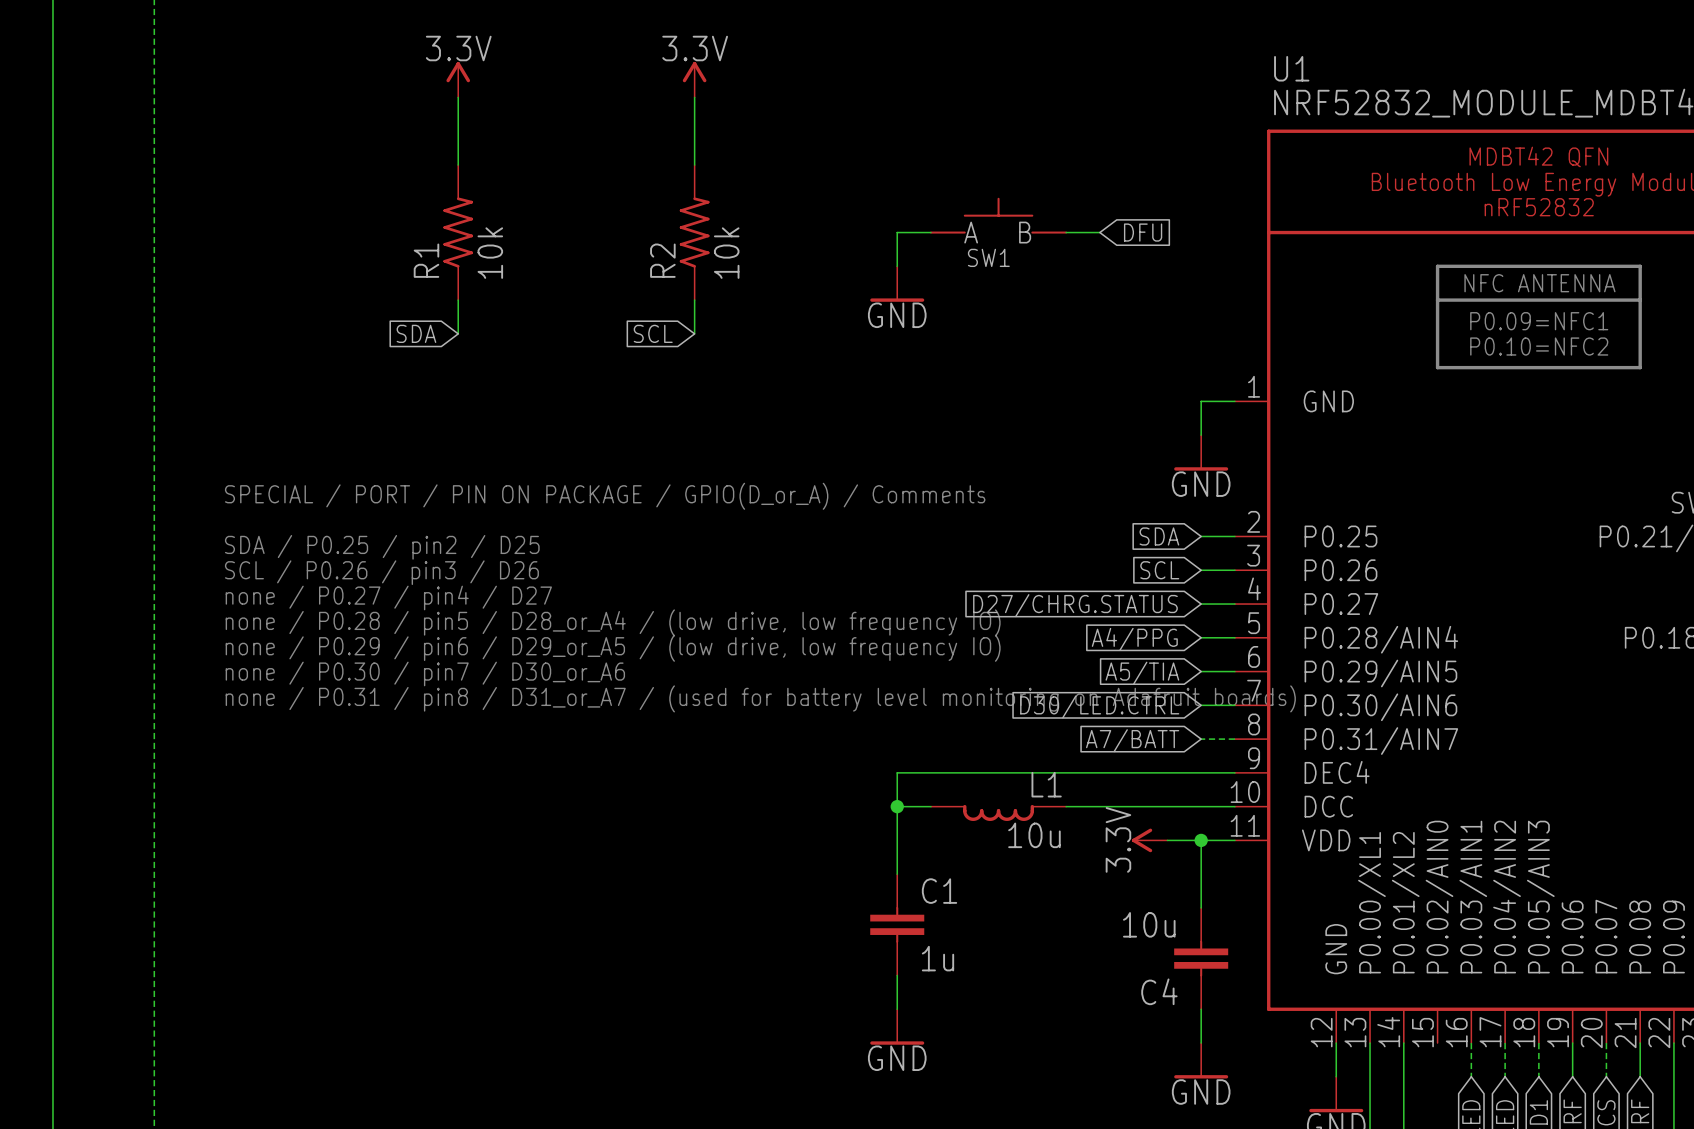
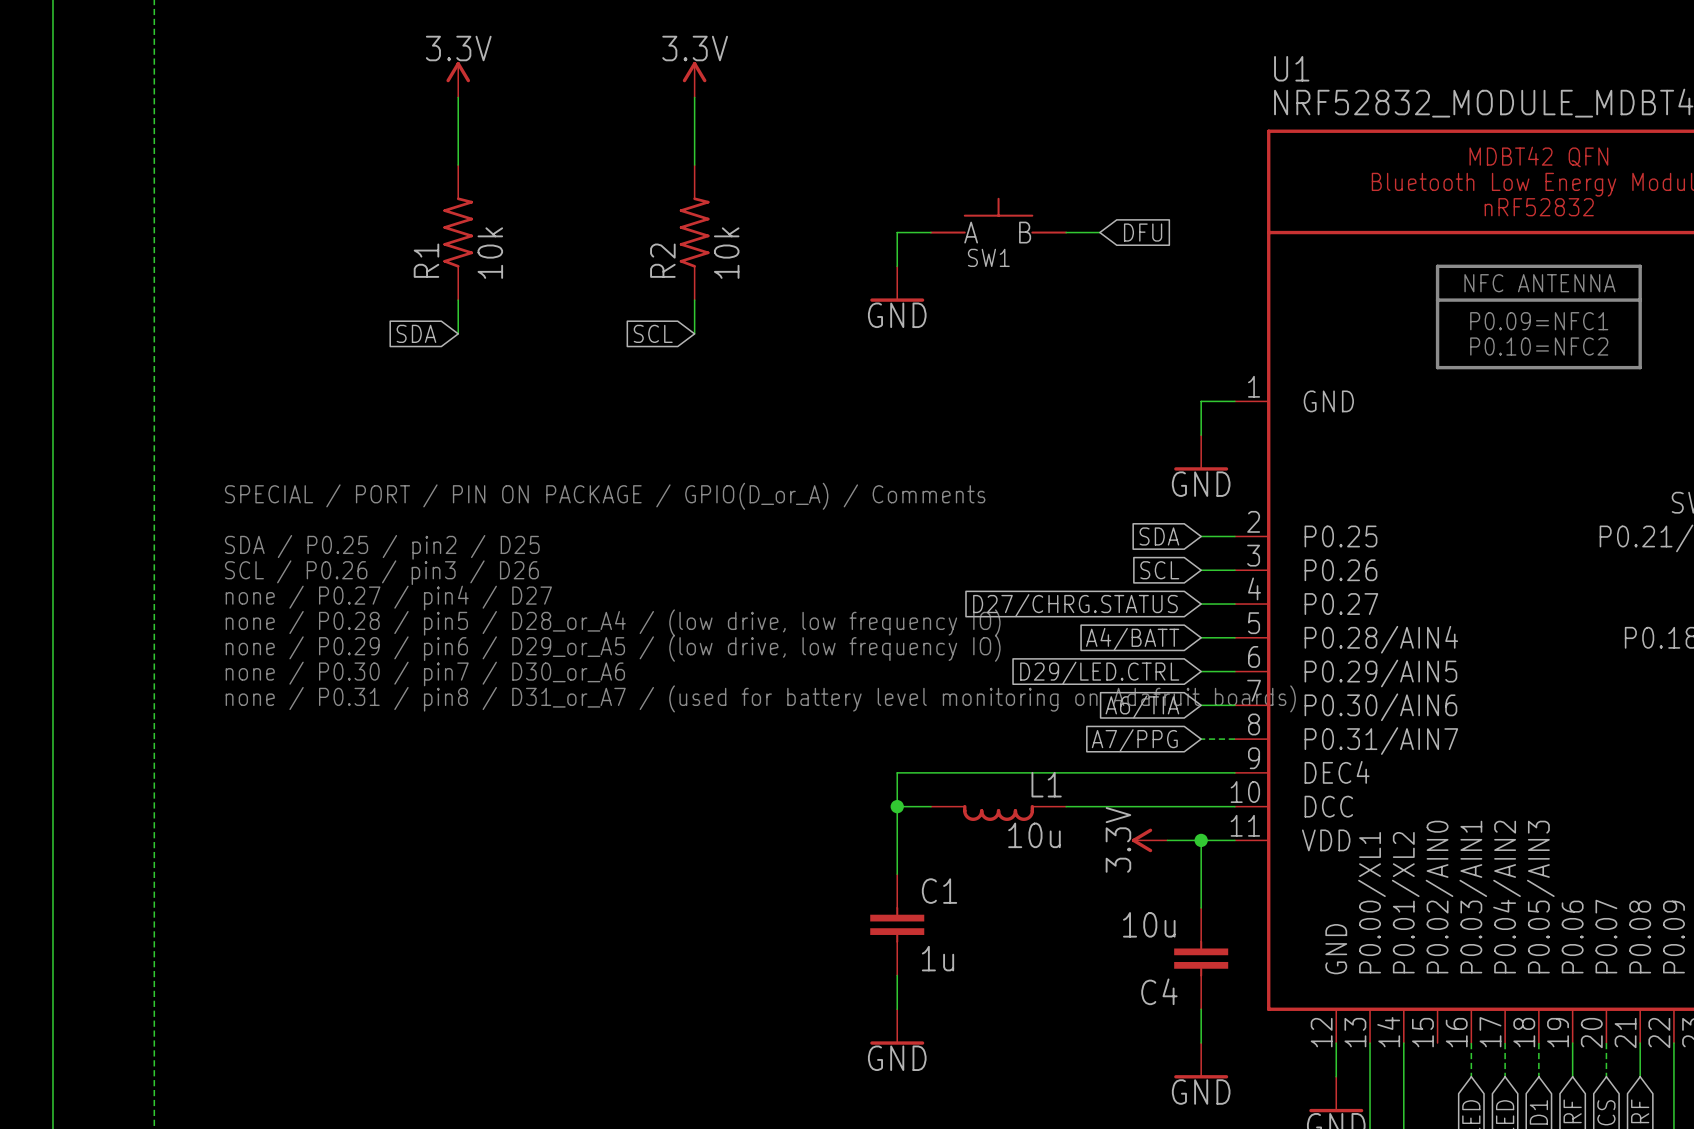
global label: A4/PPG (1134, 639) -> A4/BATT (1132, 639)
global label: A5/TIA (1142, 673) -> D29/LED.CTRL (1099, 673)
global label: D30/LED.CTRL (1099, 706) -> A6/TIA (1142, 706)
global label: A7/BATT (1132, 740) -> A7/PPG (1134, 740)

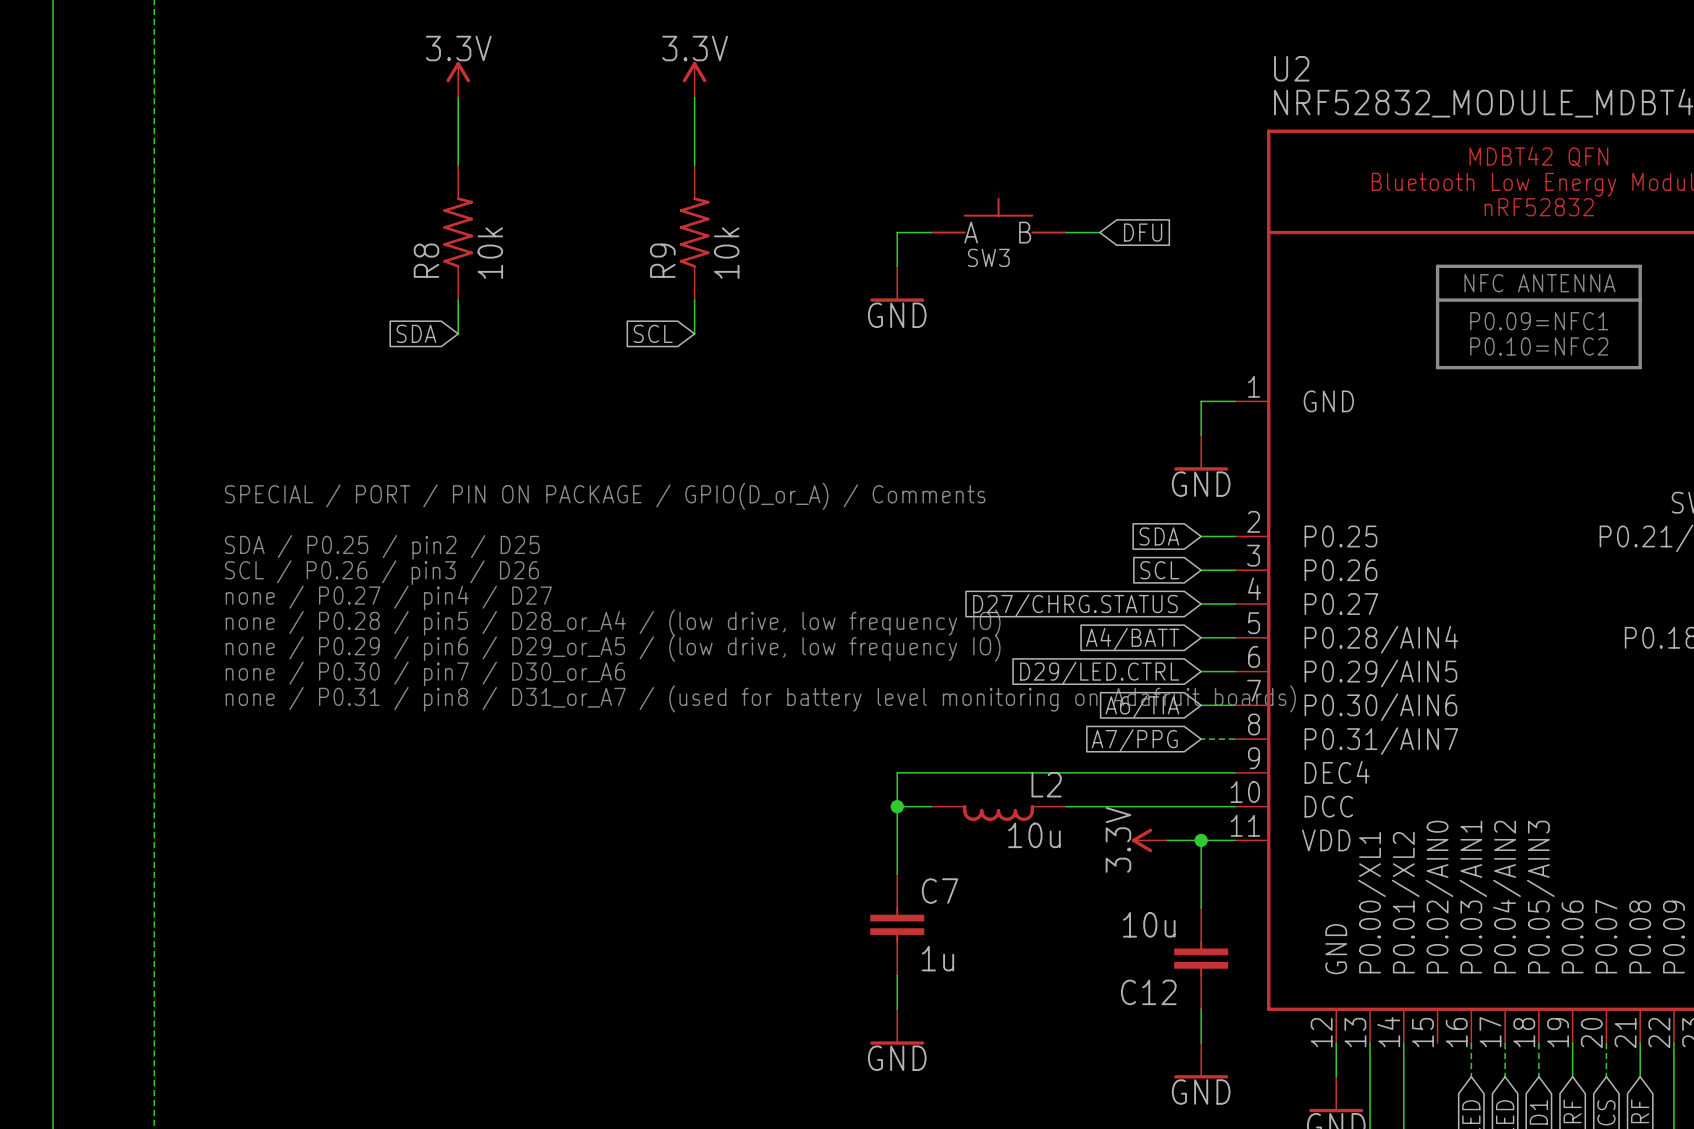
U1 name: U1 (1291, 68) -> U2 (1291, 68)
SW1 name: SW1 (988, 257) -> SW3 (988, 257)
R1 name: R1 (426, 260) -> R8 (426, 260)
R2 name: R2 (662, 260) -> R9 (662, 260)
L1 name: L1 (1046, 784) -> L2 (1046, 784)
C1 name: C1 (939, 891) -> C7 (940, 891)
C4 name: C4 (1159, 991) -> C12 (1148, 992)

